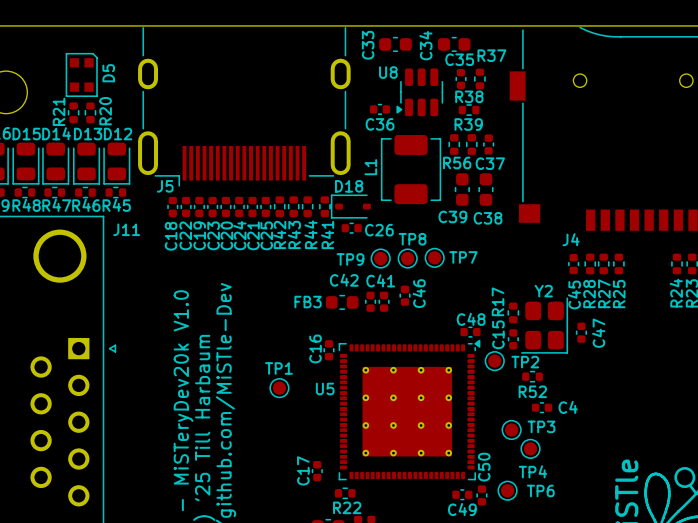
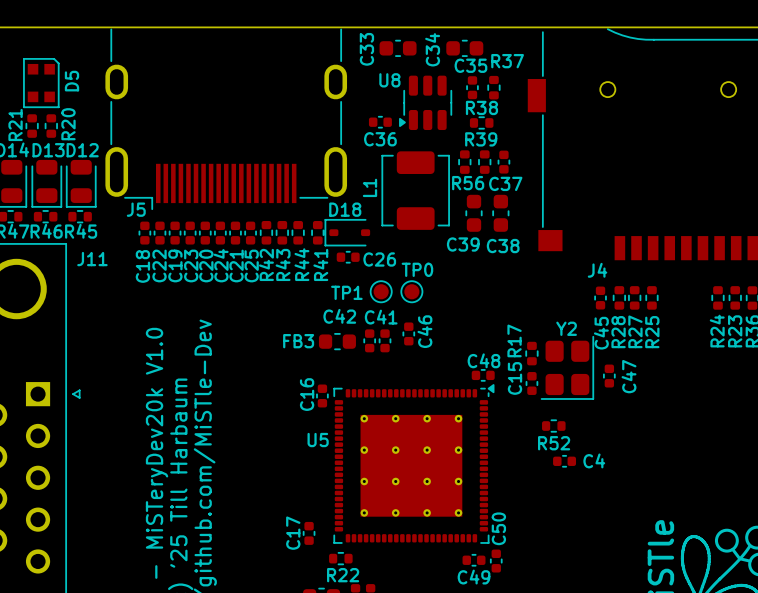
TP8 name: TP8 (412, 239) -> TP0 (417, 269)
TP7: (434, 257) -> none
TP9 name: TP9 (350, 259) -> TP1 (346, 292)
TP2: (494, 361) -> none
TP1: (279, 388) -> none
TP3: (511, 429) -> none
TP4: (530, 448) -> none
TP6: (507, 490) -> none

